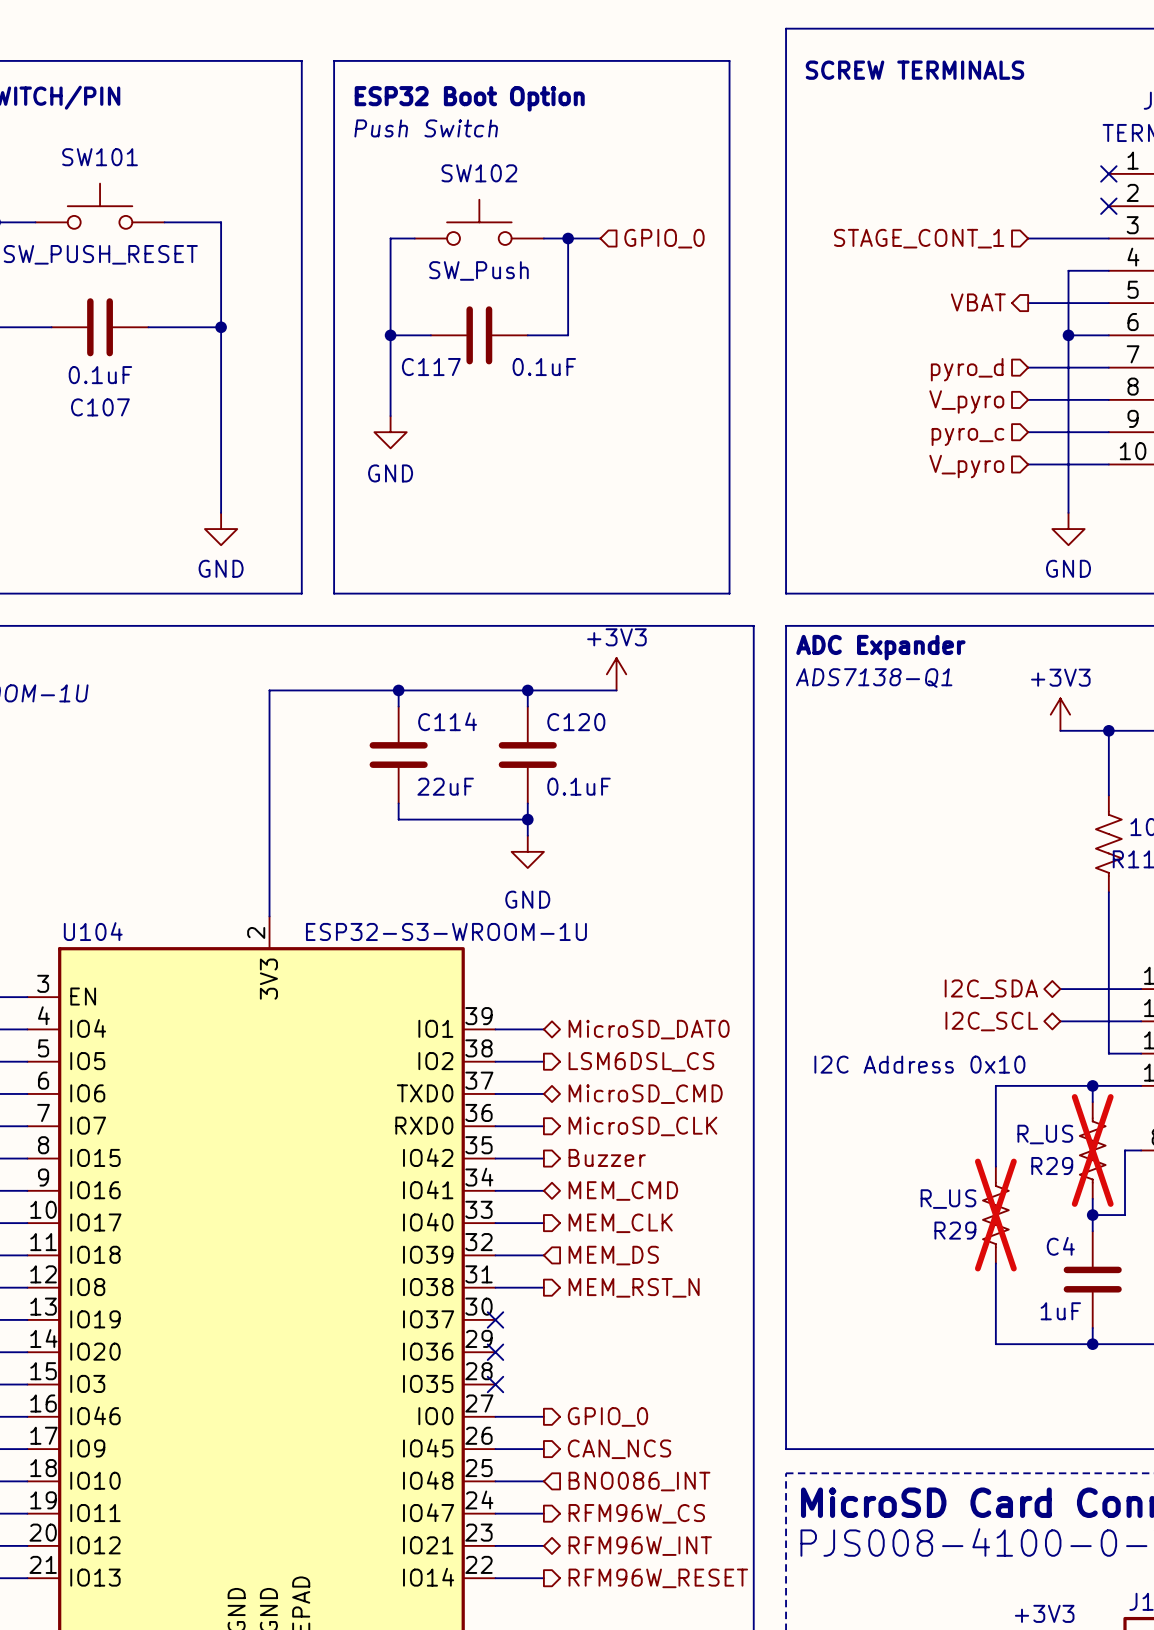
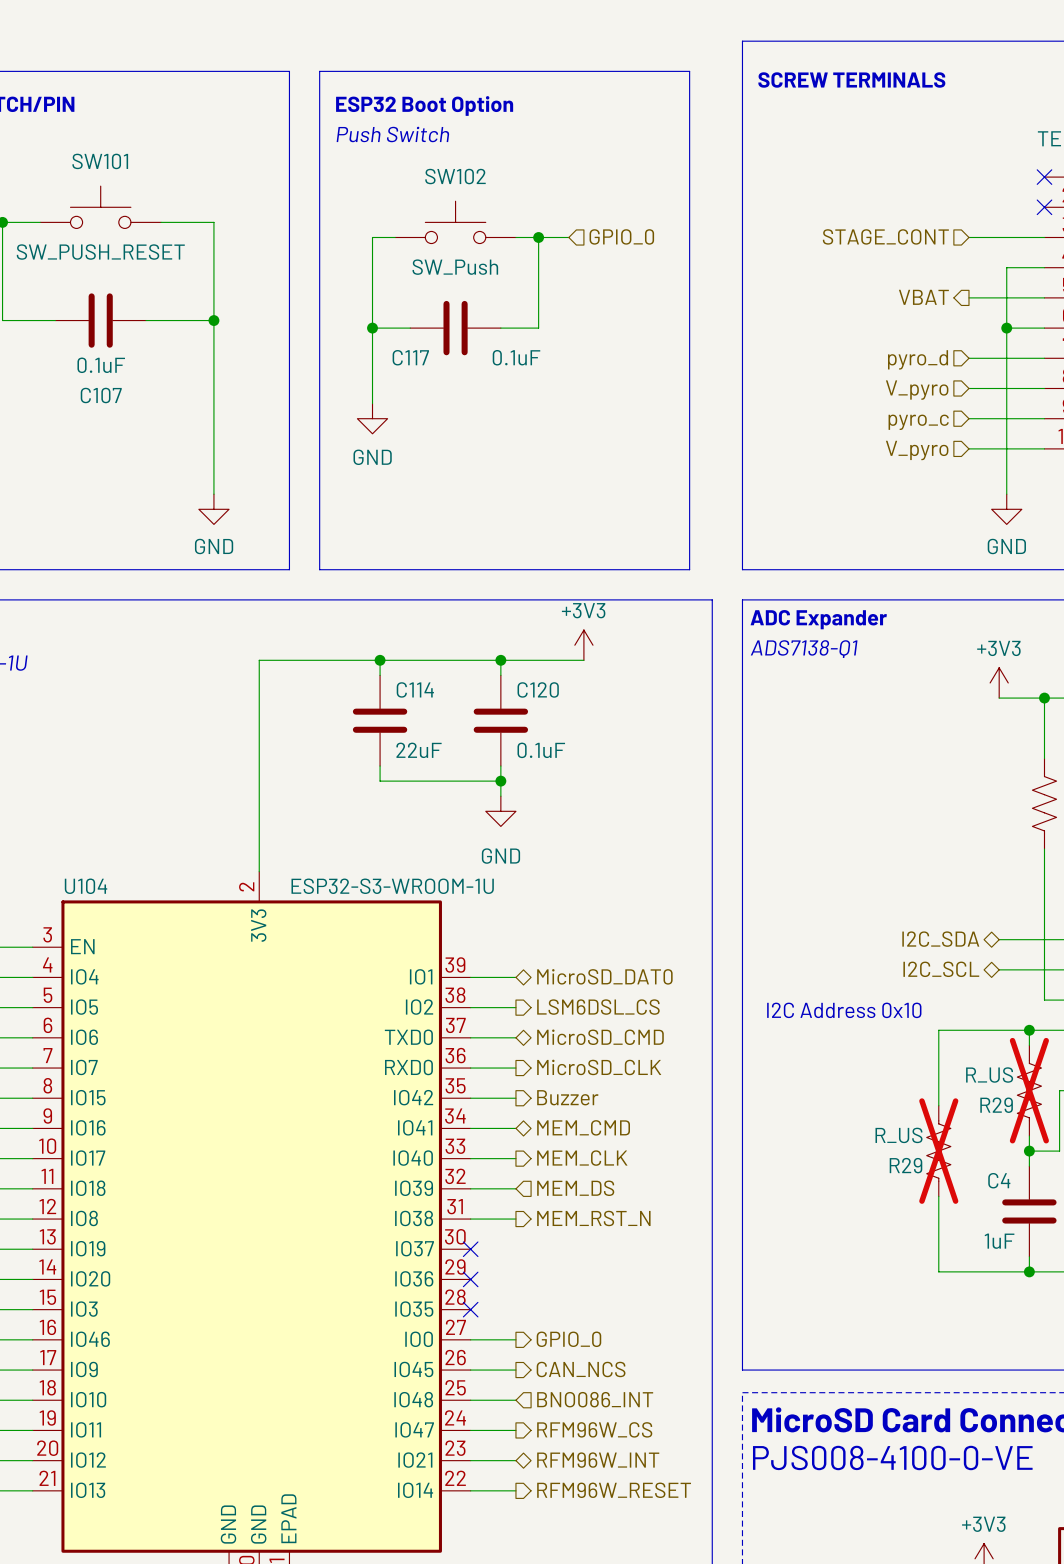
hierarchical label: STAGE_CONT_1 (919, 238) -> STAGE_CONT (885, 236)

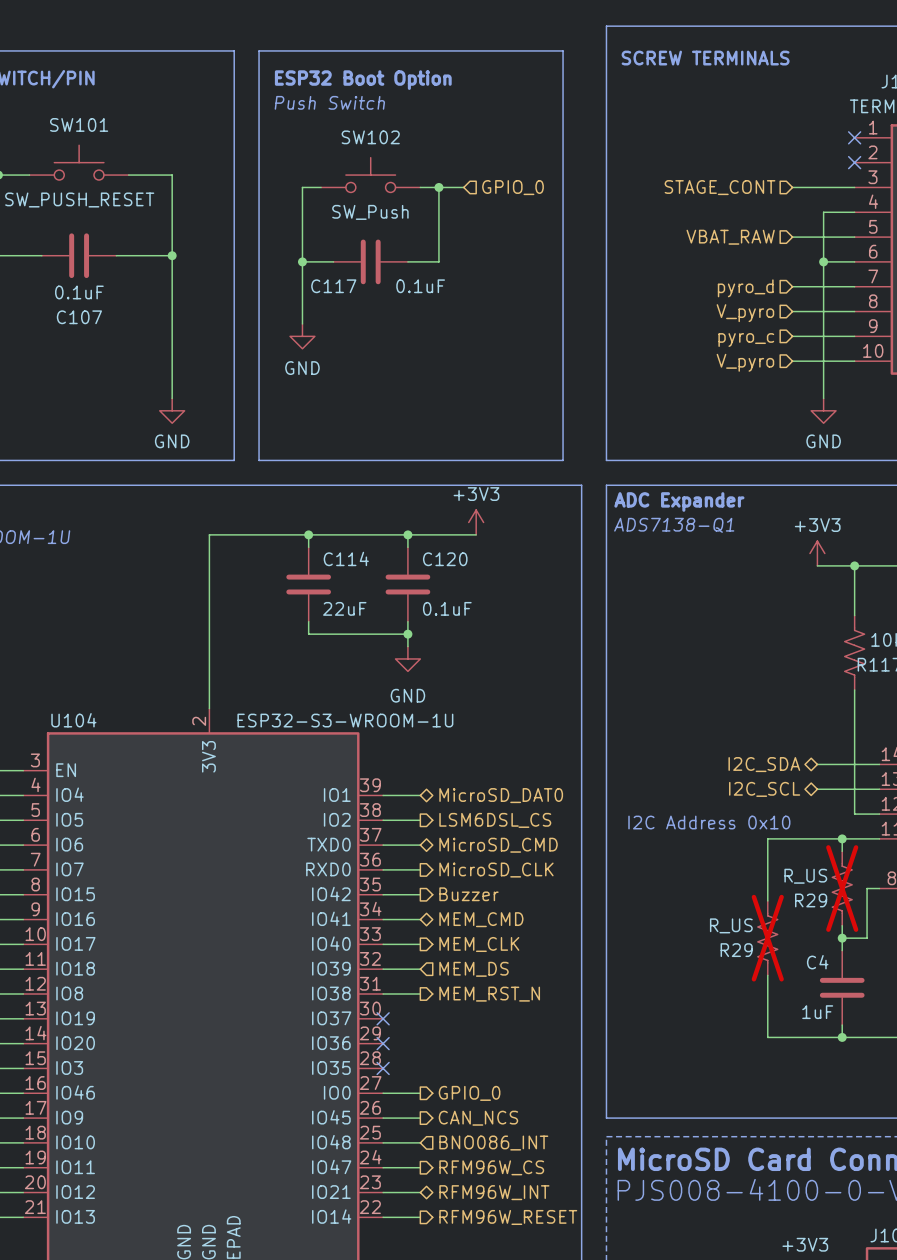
hierarchical label shape: output (923, 297) -> input (730, 237)
hierarchical label: VBAT (923, 297) -> VBAT_RAW (730, 237)

